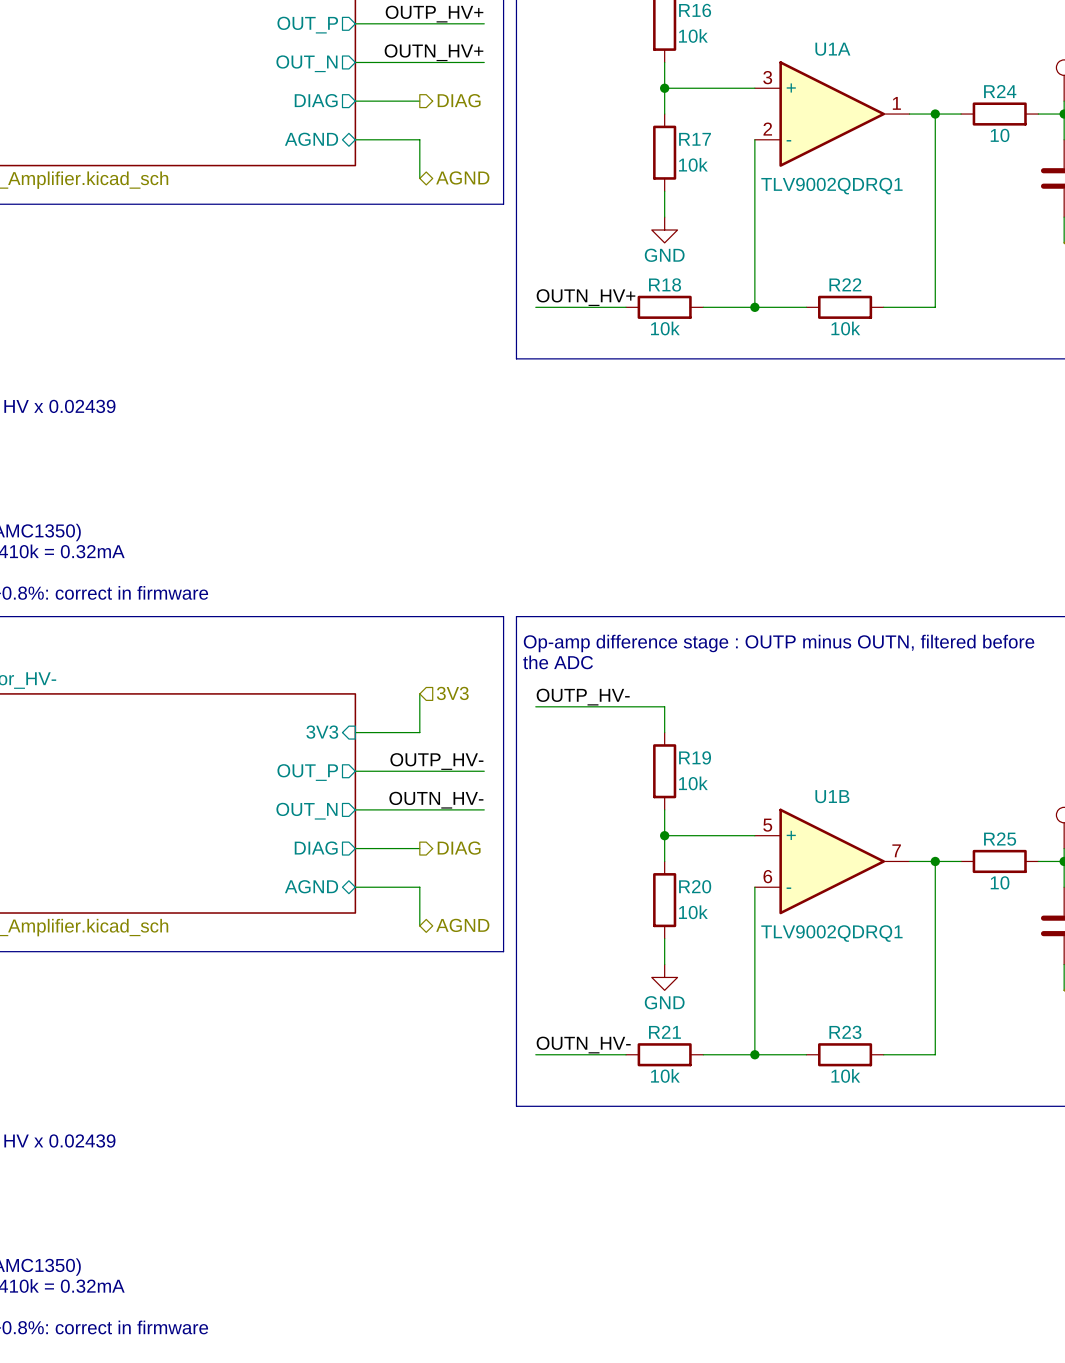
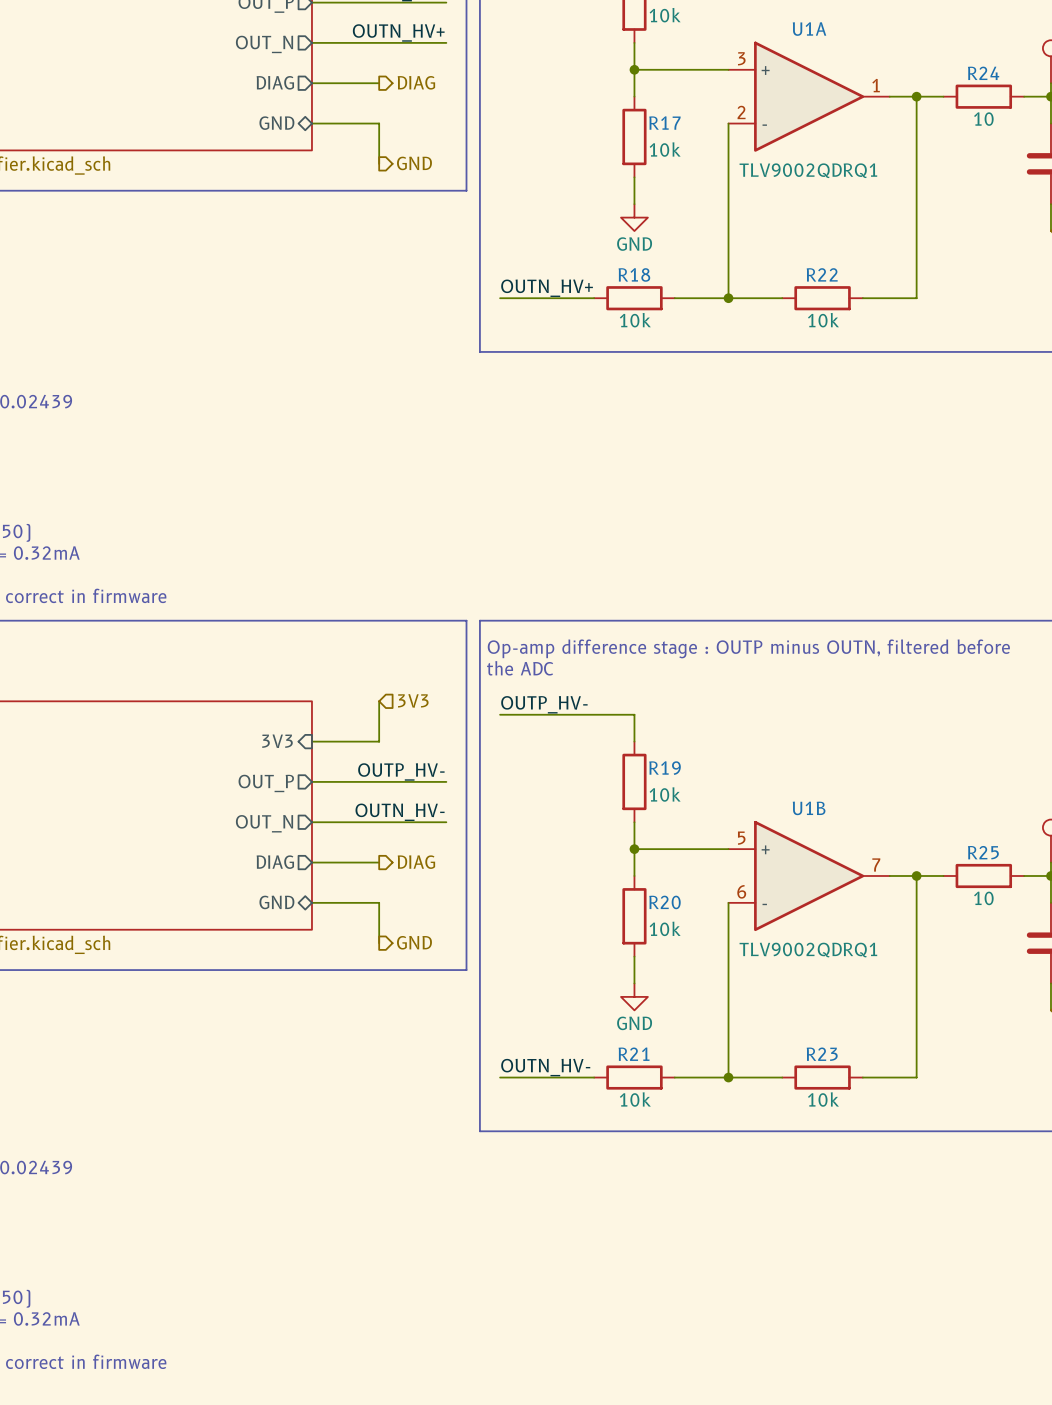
sheet pin: AGND (311, 139) -> GND (276, 123)
hierarchical label shape: bidirectional (462, 177) -> output (414, 163)
hierarchical label: AGND (462, 177) -> GND (414, 163)
sheet pin: AGND (311, 886) -> GND (276, 902)
hierarchical label shape: bidirectional (462, 925) -> output (414, 942)
hierarchical label: AGND (462, 925) -> GND (414, 942)

